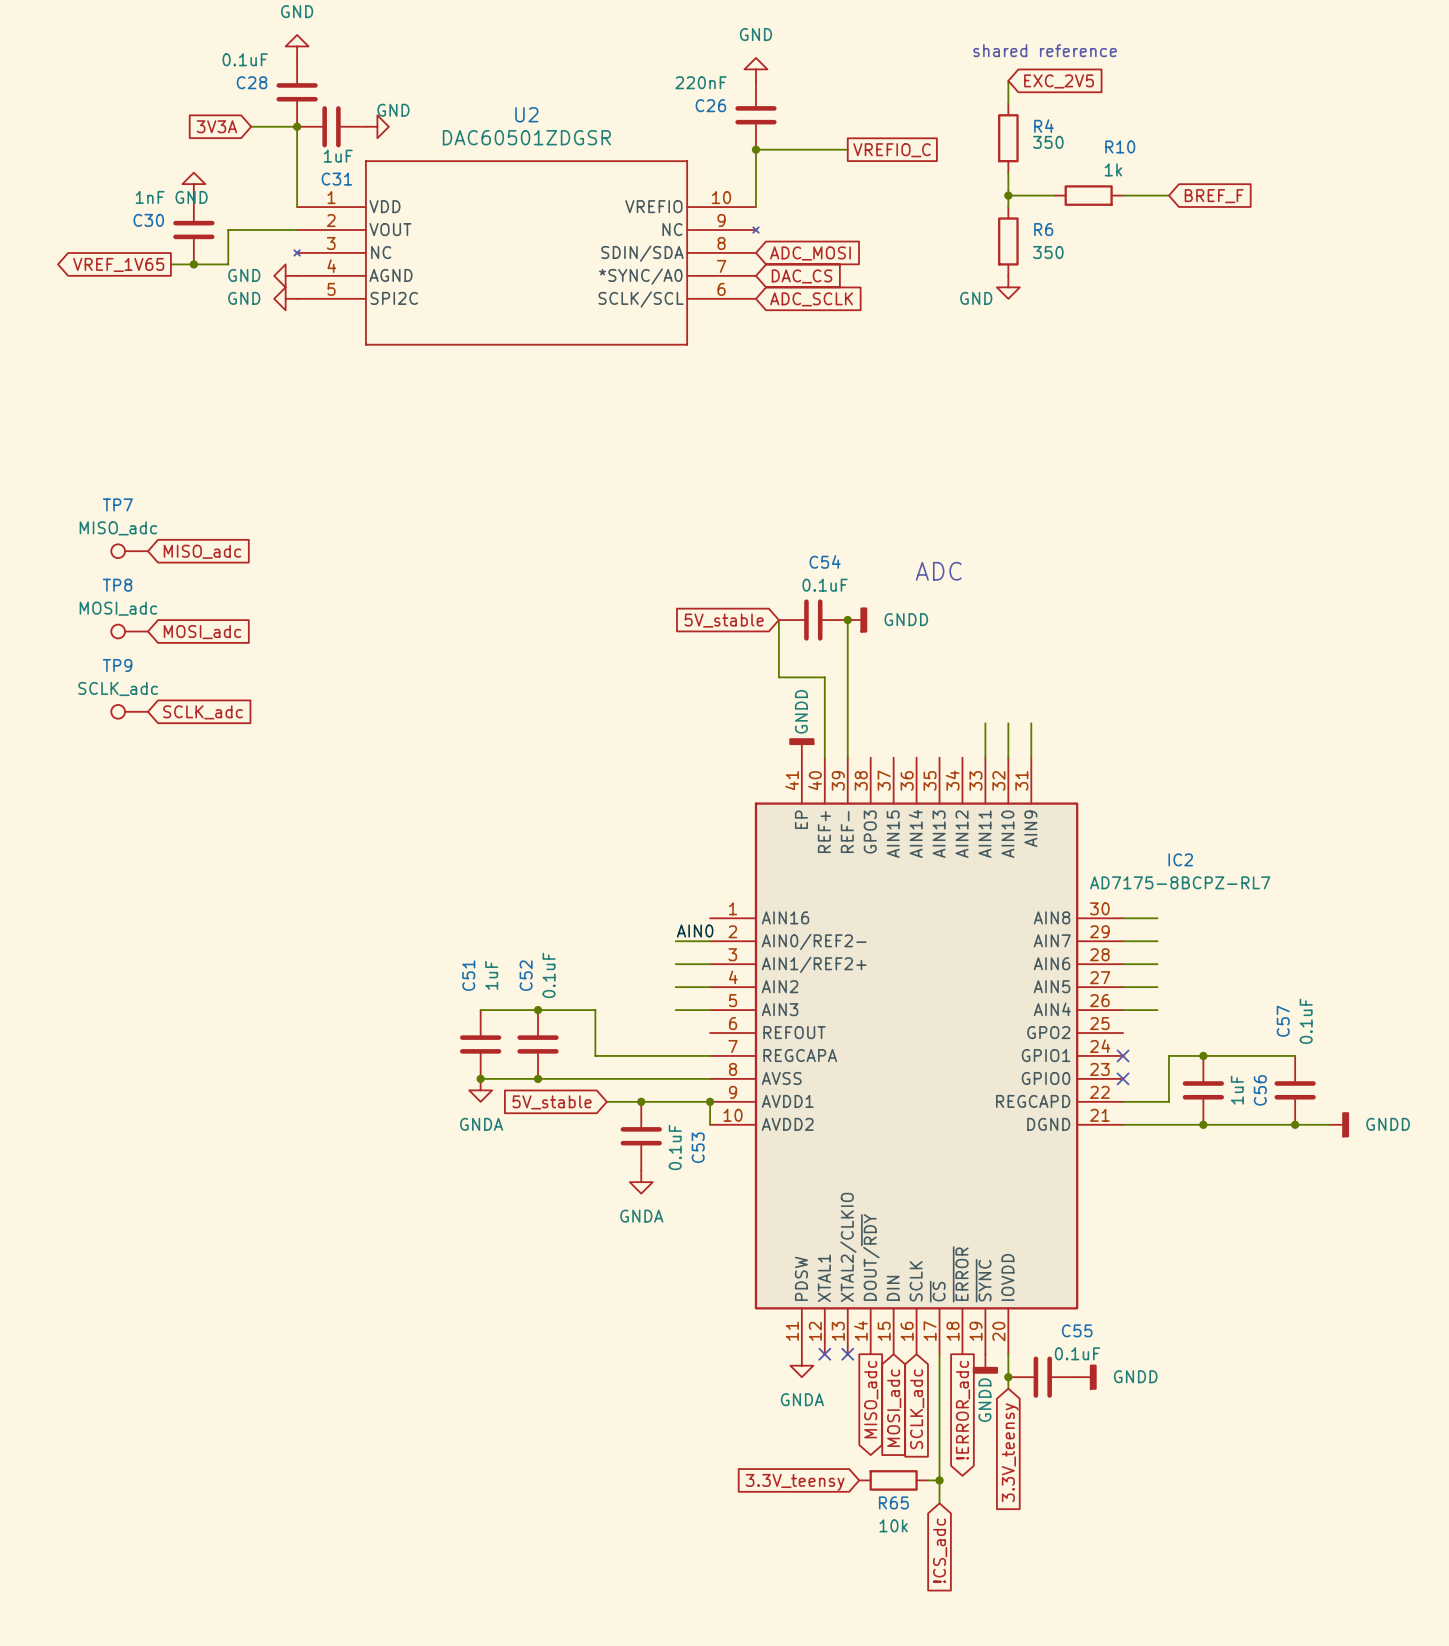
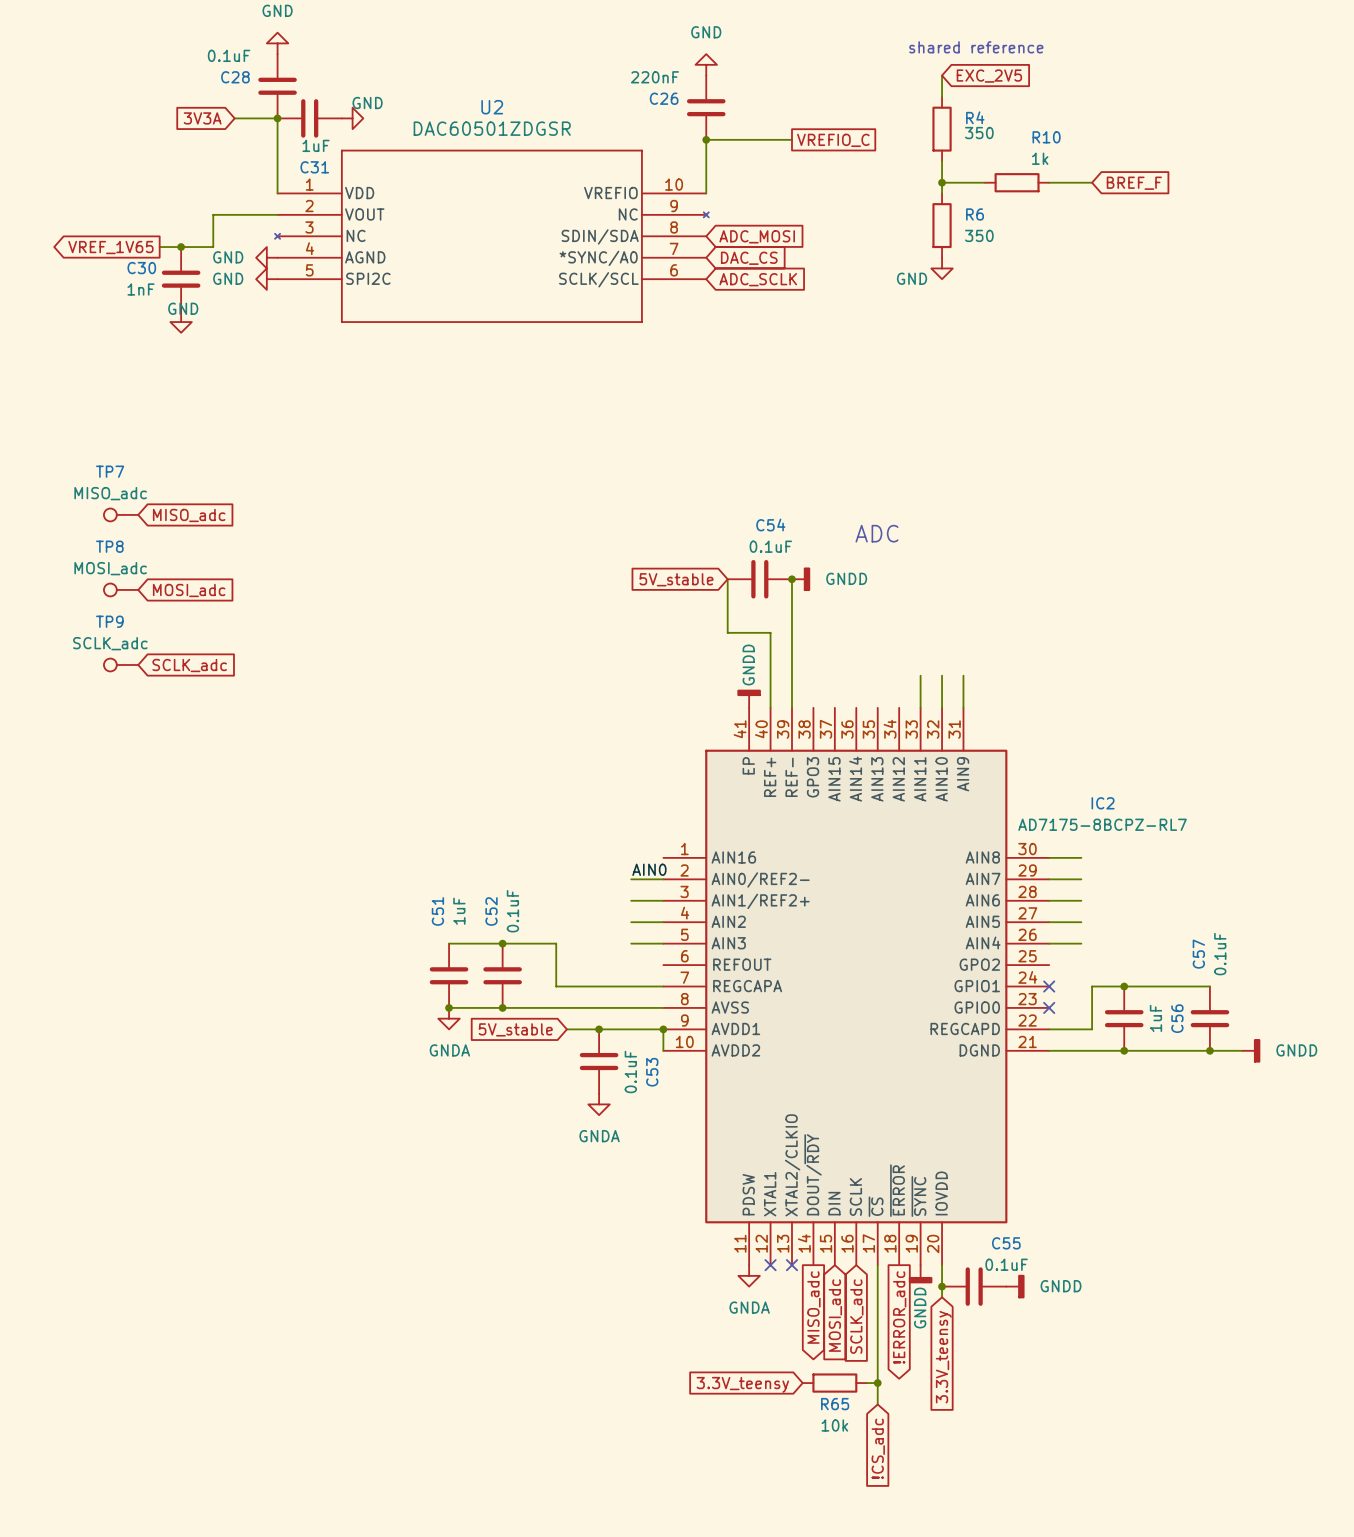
power symbol rotation: 0° (193, 184) -> 180° (181, 322)
power symbol position: GND (193, 184) -> GND (181, 322)
C30 value position: 1nF (150, 197) -> 1nF (141, 289)
C30 name position: C30 (148, 220) -> C30 (141, 268)
C30 position: (193, 230) -> (181, 279)

